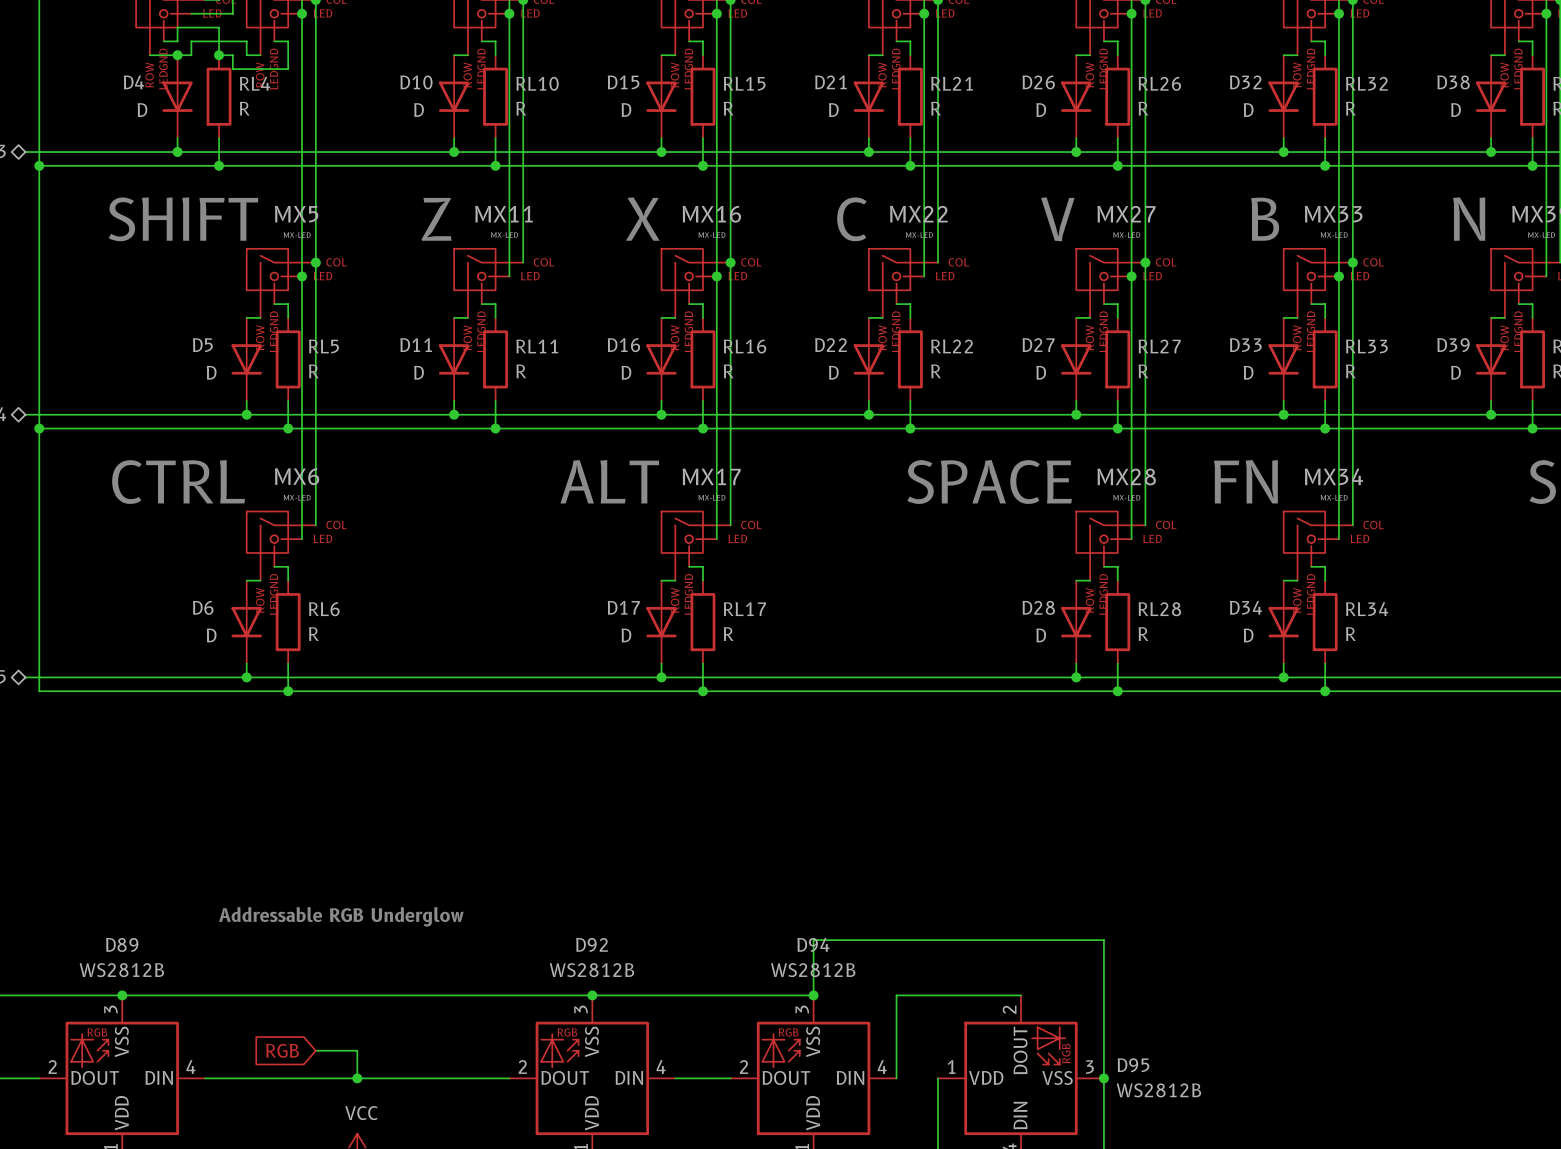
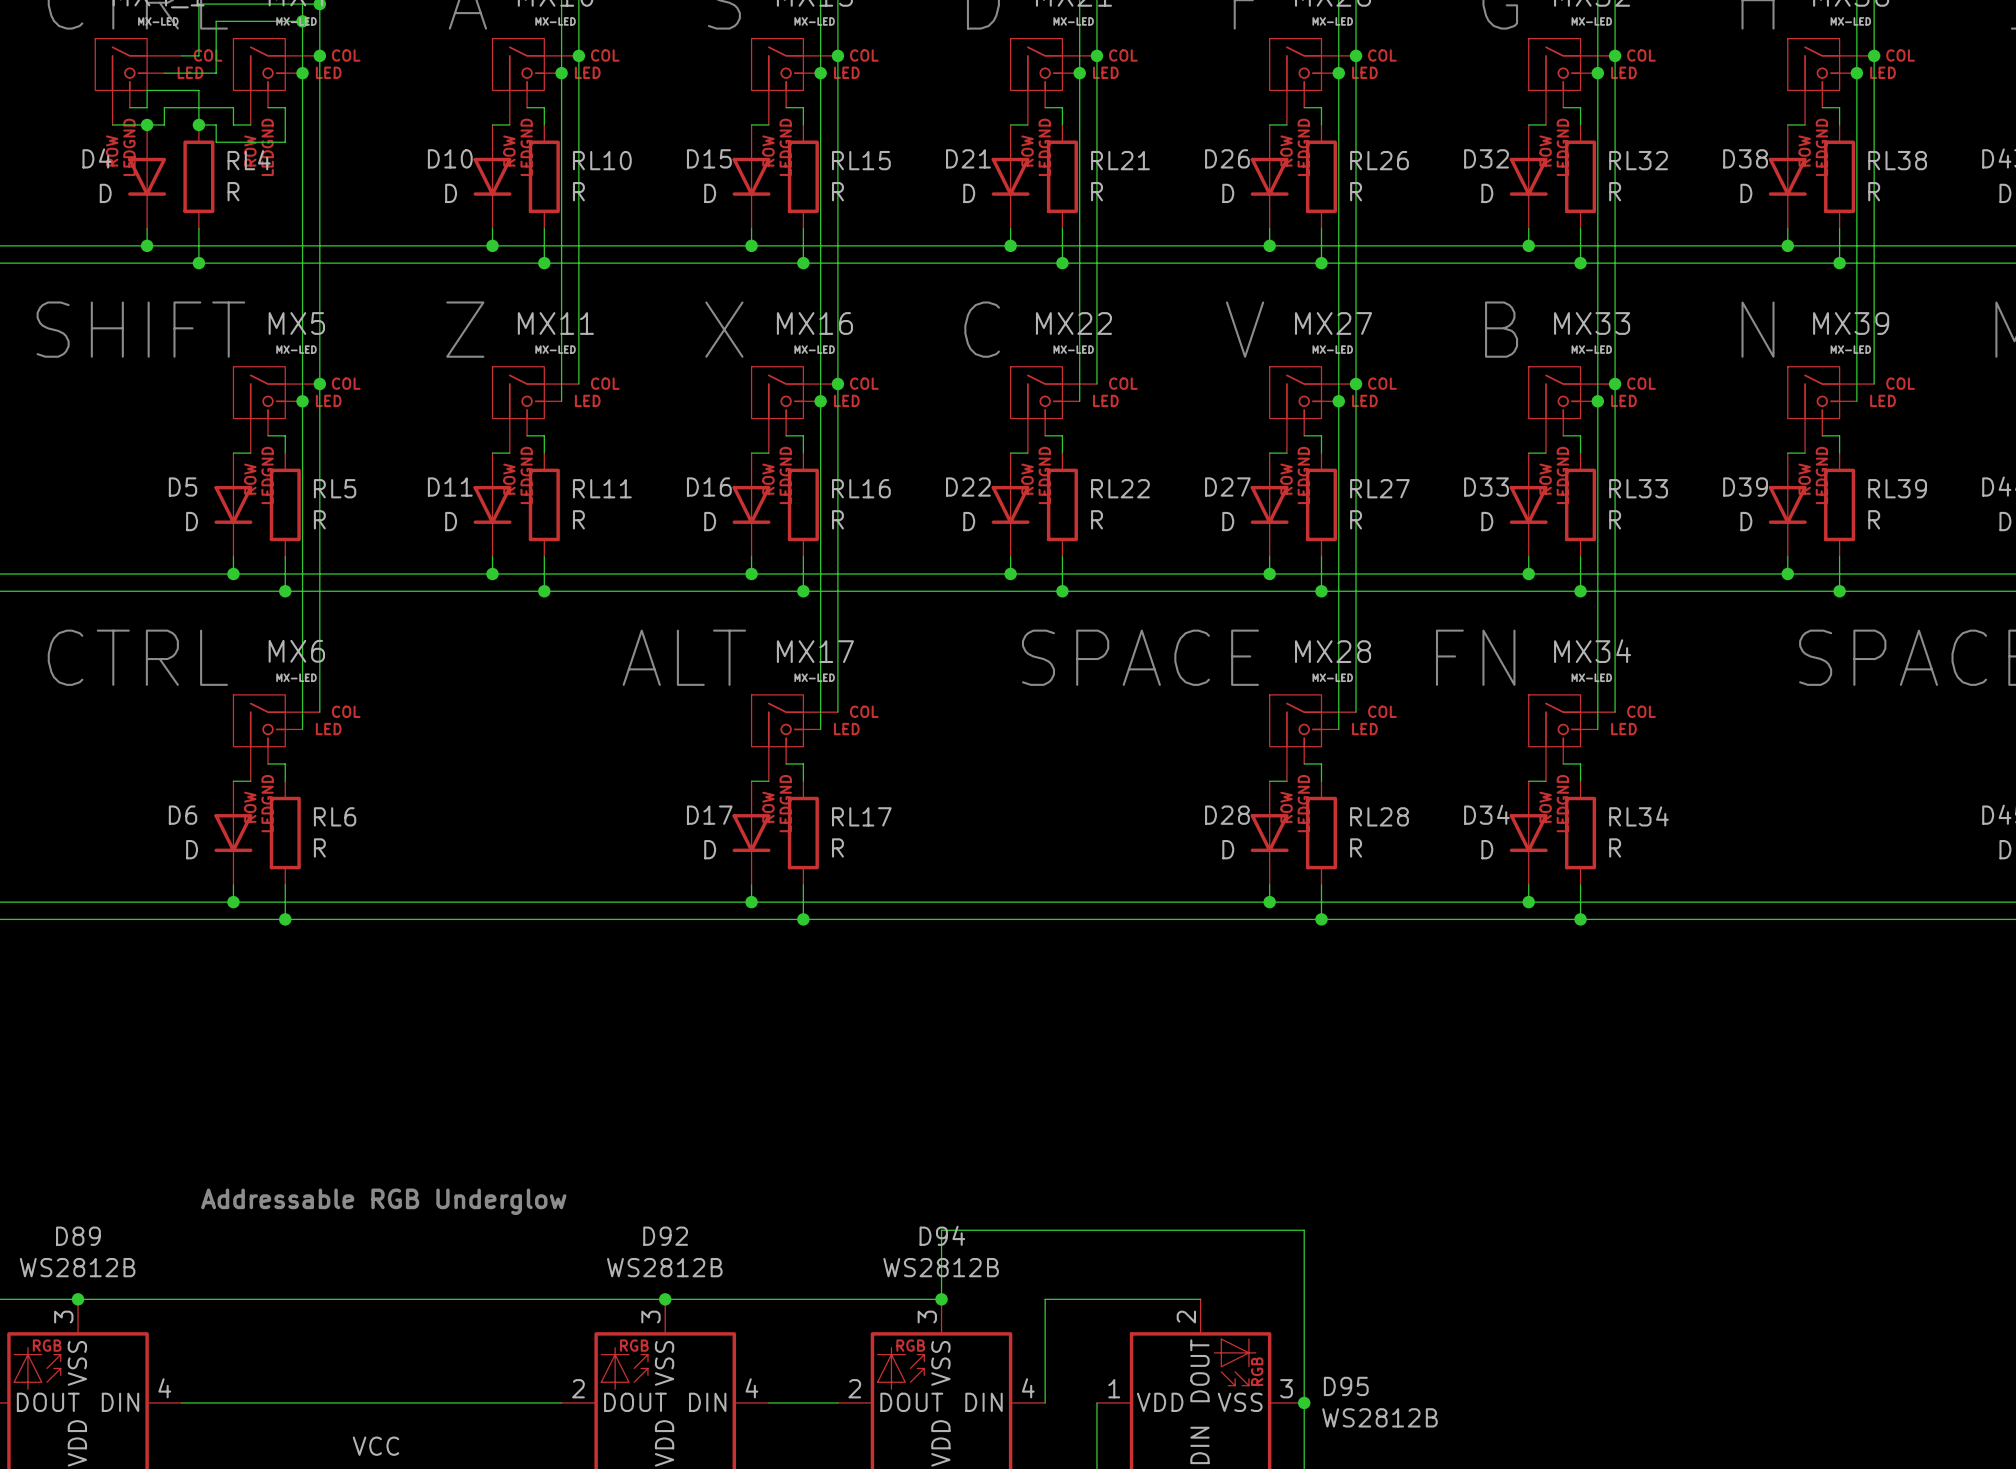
global label: RGB (282, 1050) -> none
wire: (315, 1050) (357, 1050) (357, 1078) -> none
junction: (357, 1078) -> none

